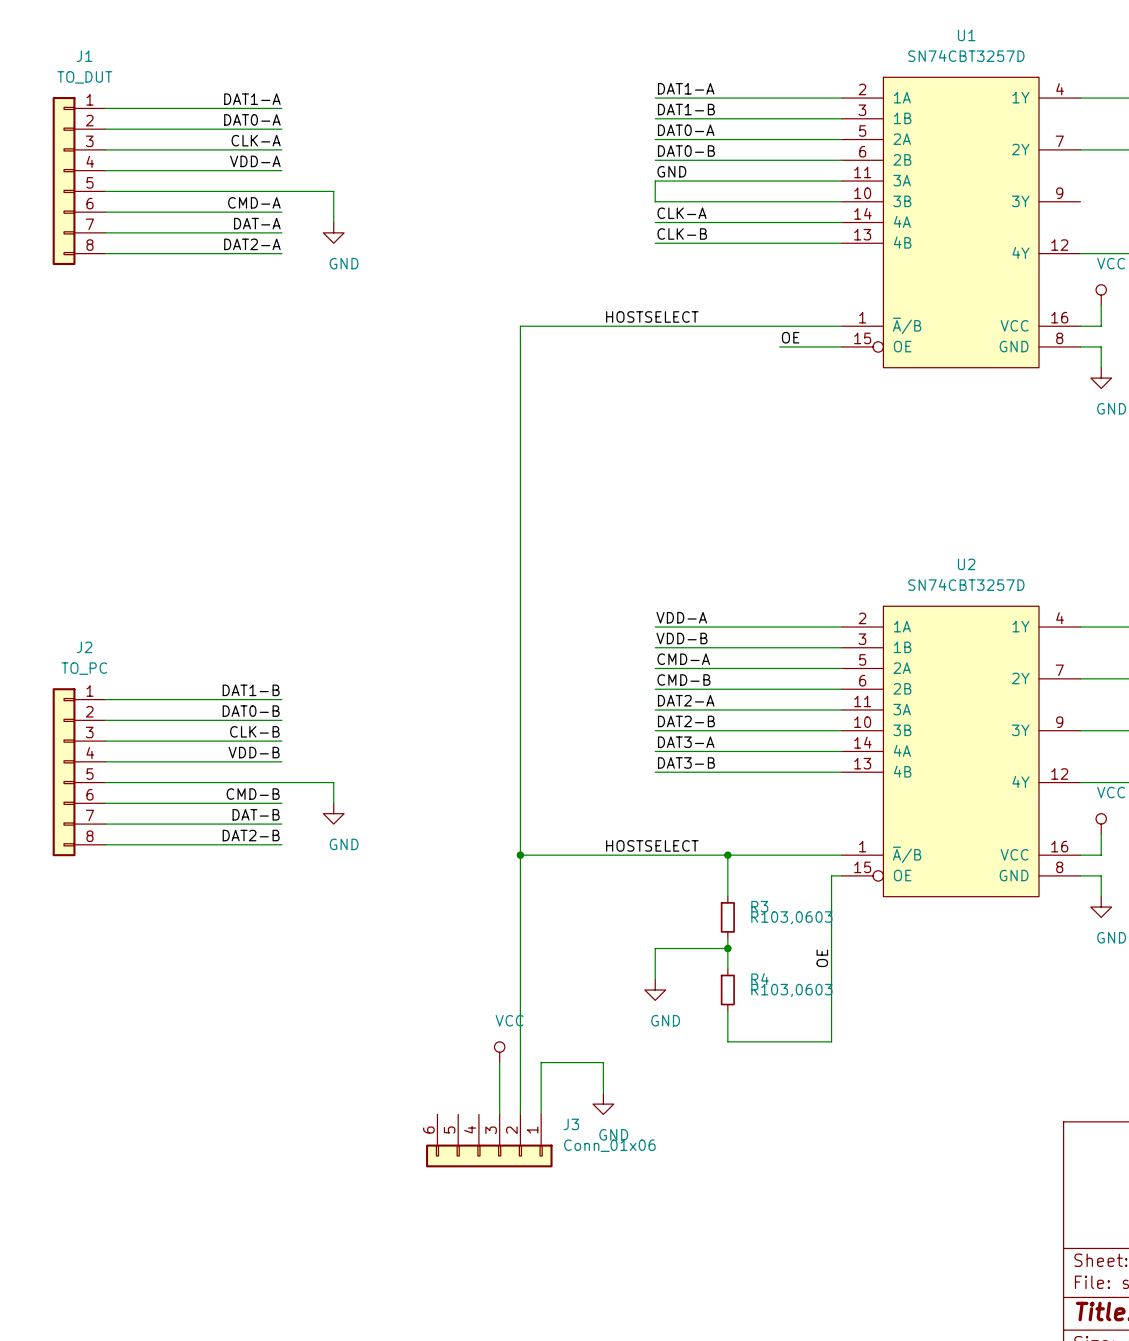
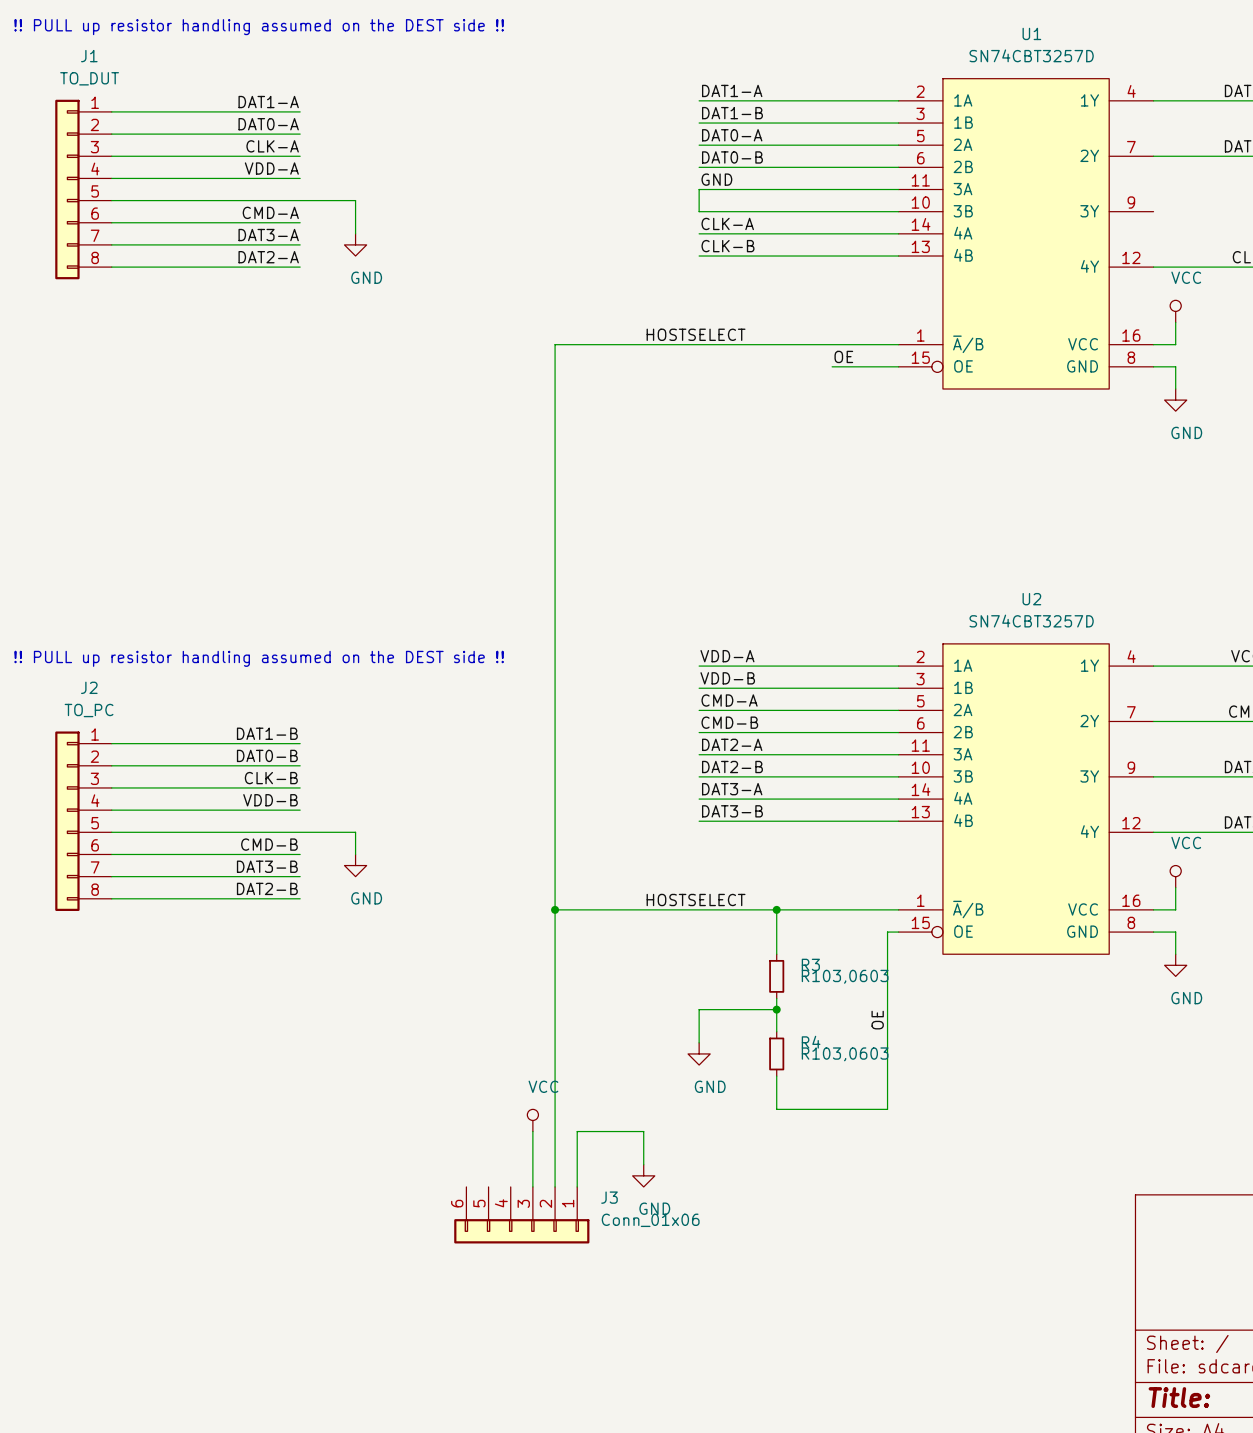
text: none -> !! PULL up resistor handling assumed on the DEST side !! (259, 27)
label: DAT-A (257, 223) -> DAT3-A (268, 235)
text: none -> !! PULL up resistor handling assumed on the DEST side !! (259, 658)
label: DAT-B (256, 814) -> DAT3-B (267, 866)

